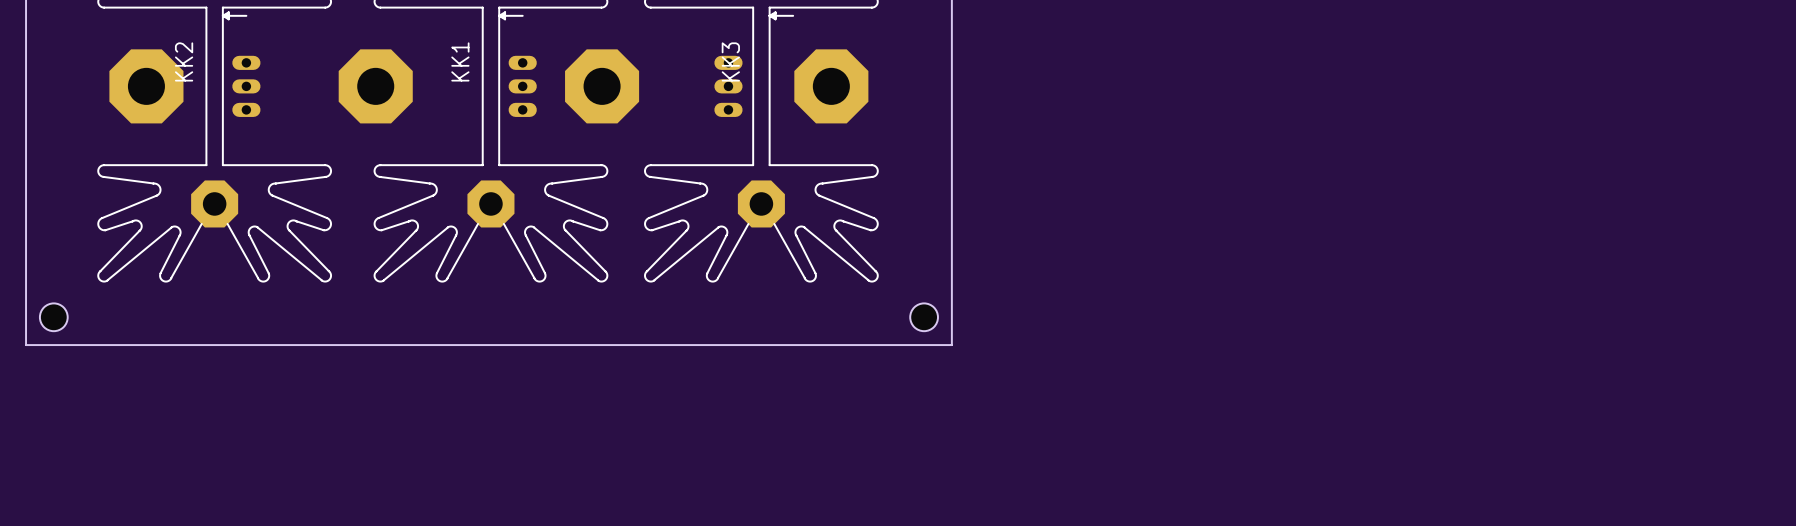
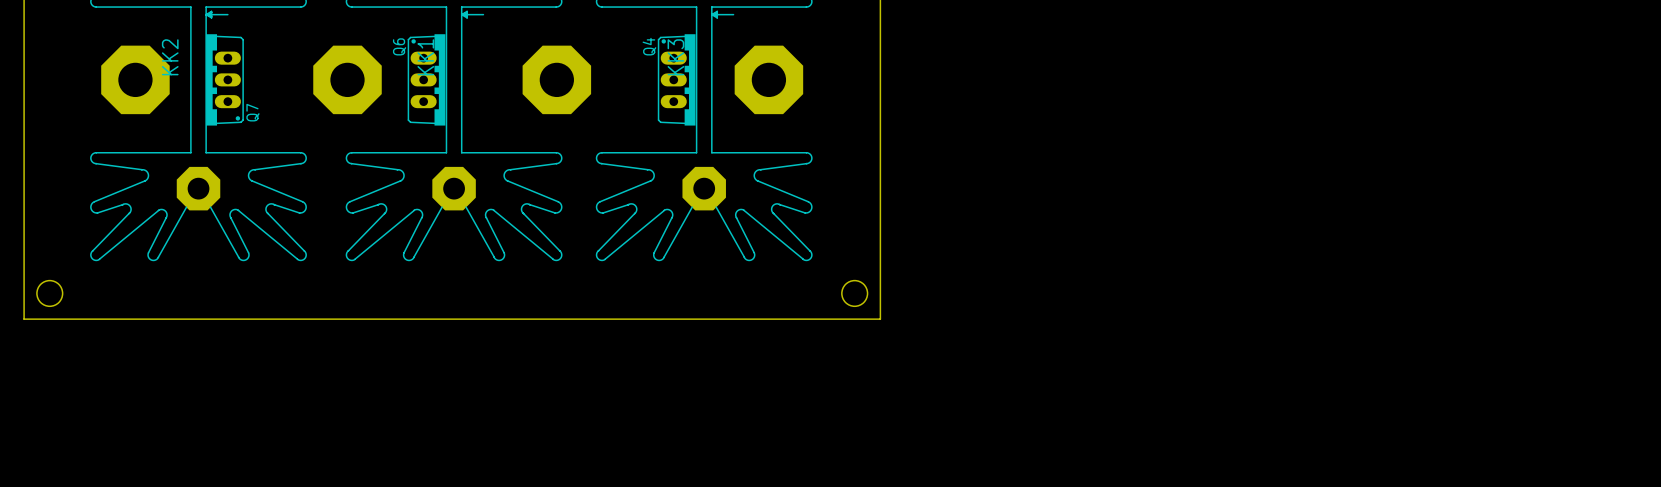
Q7 side: top (246, 86) -> bottom (224, 79)
Q6 side: top (522, 86) -> bottom (426, 79)
Q4 side: top (728, 86) -> bottom (676, 79)

